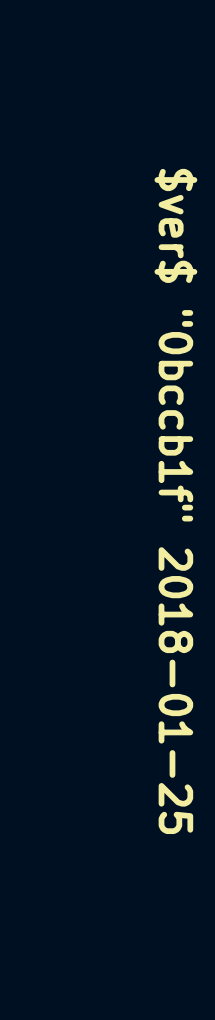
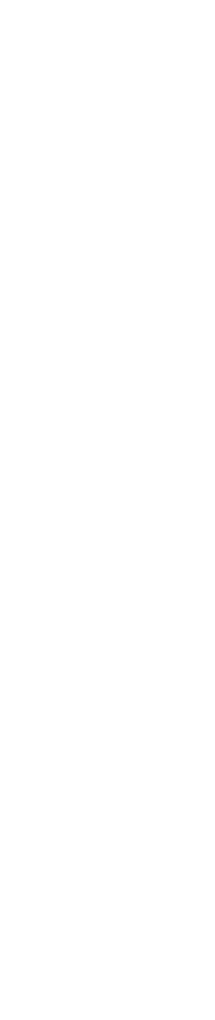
text: $ver$ "0bccb1f" 2018-01-25 (175, 501) -> none

